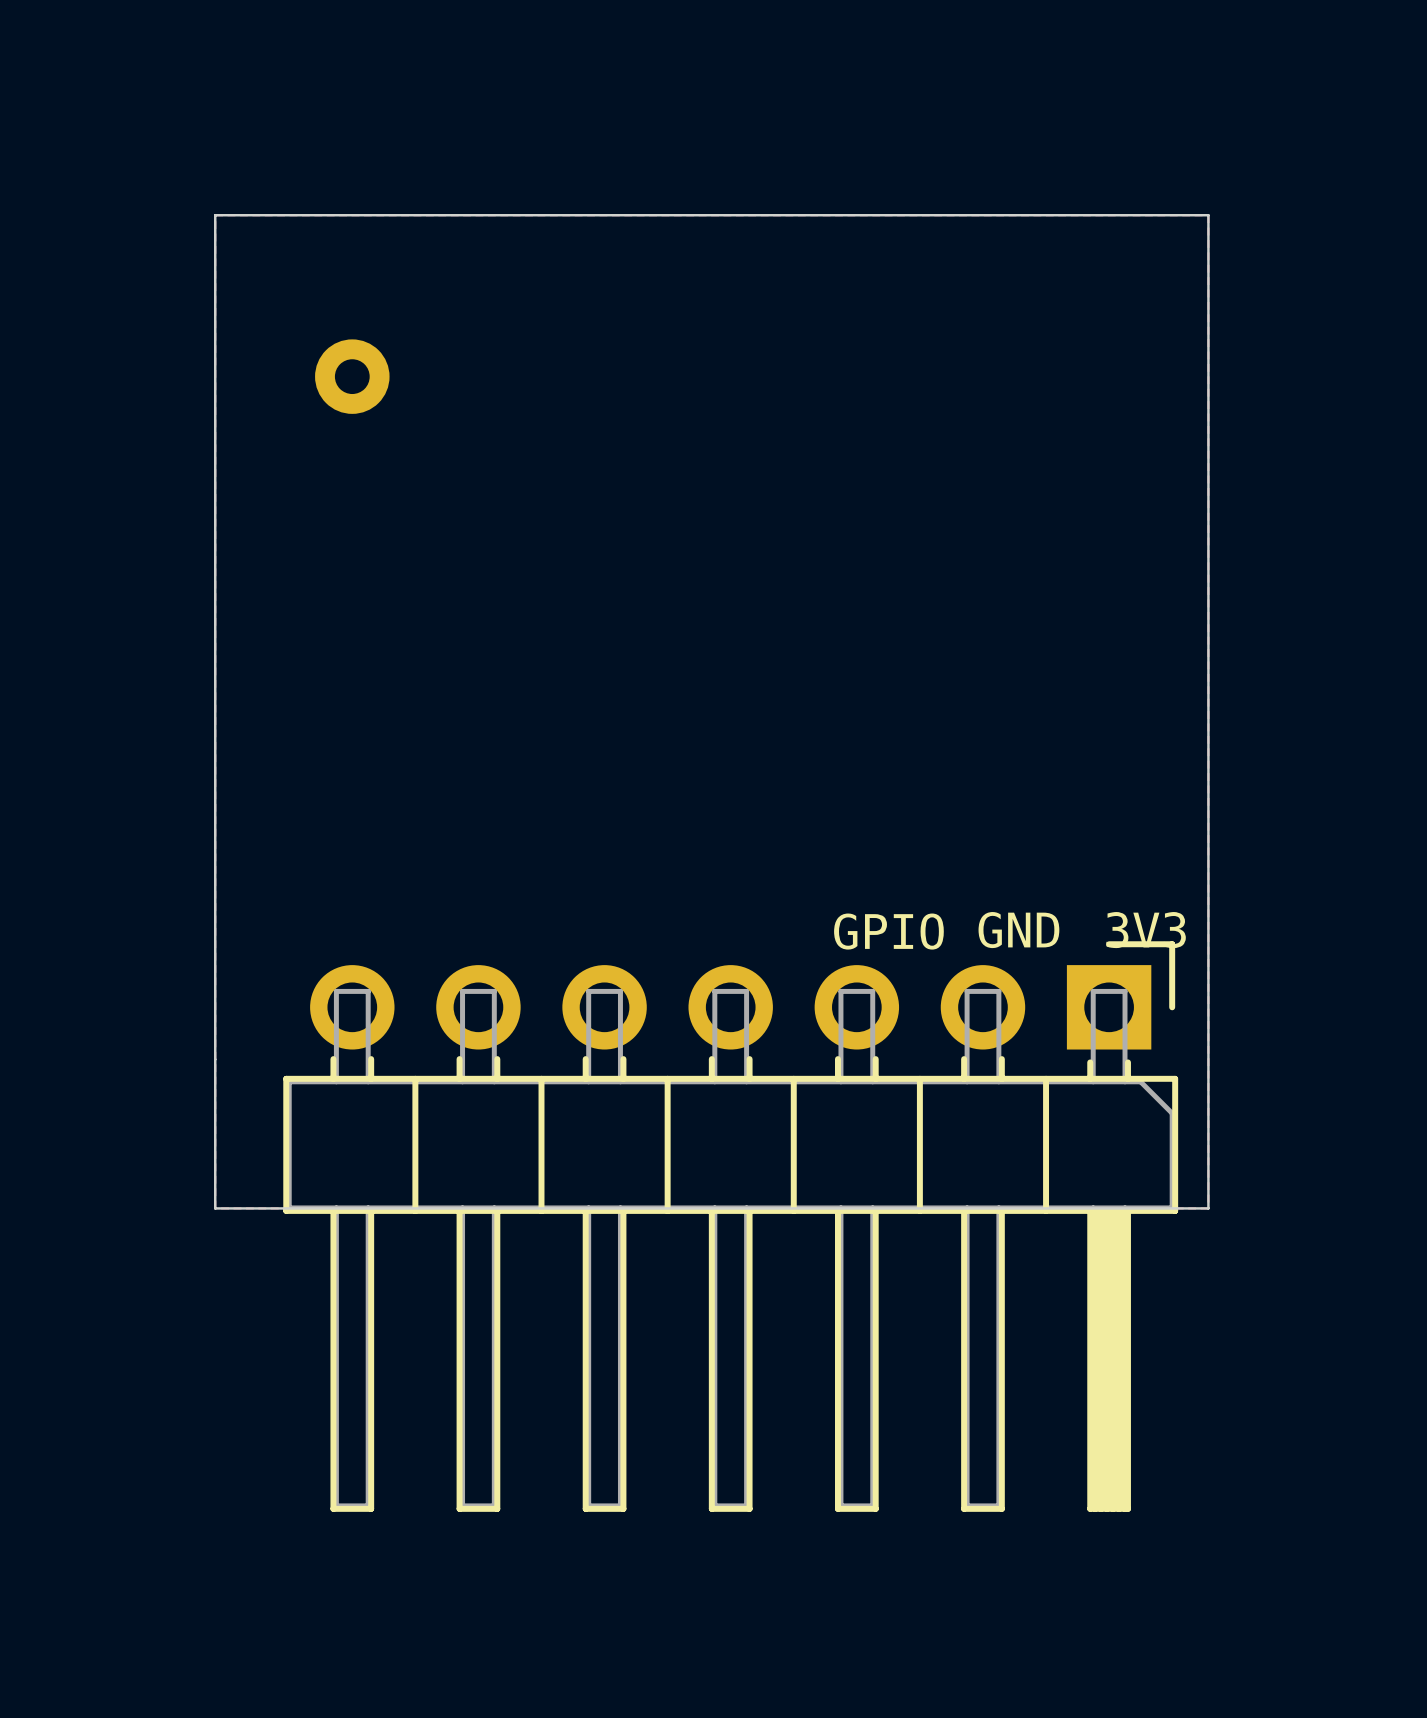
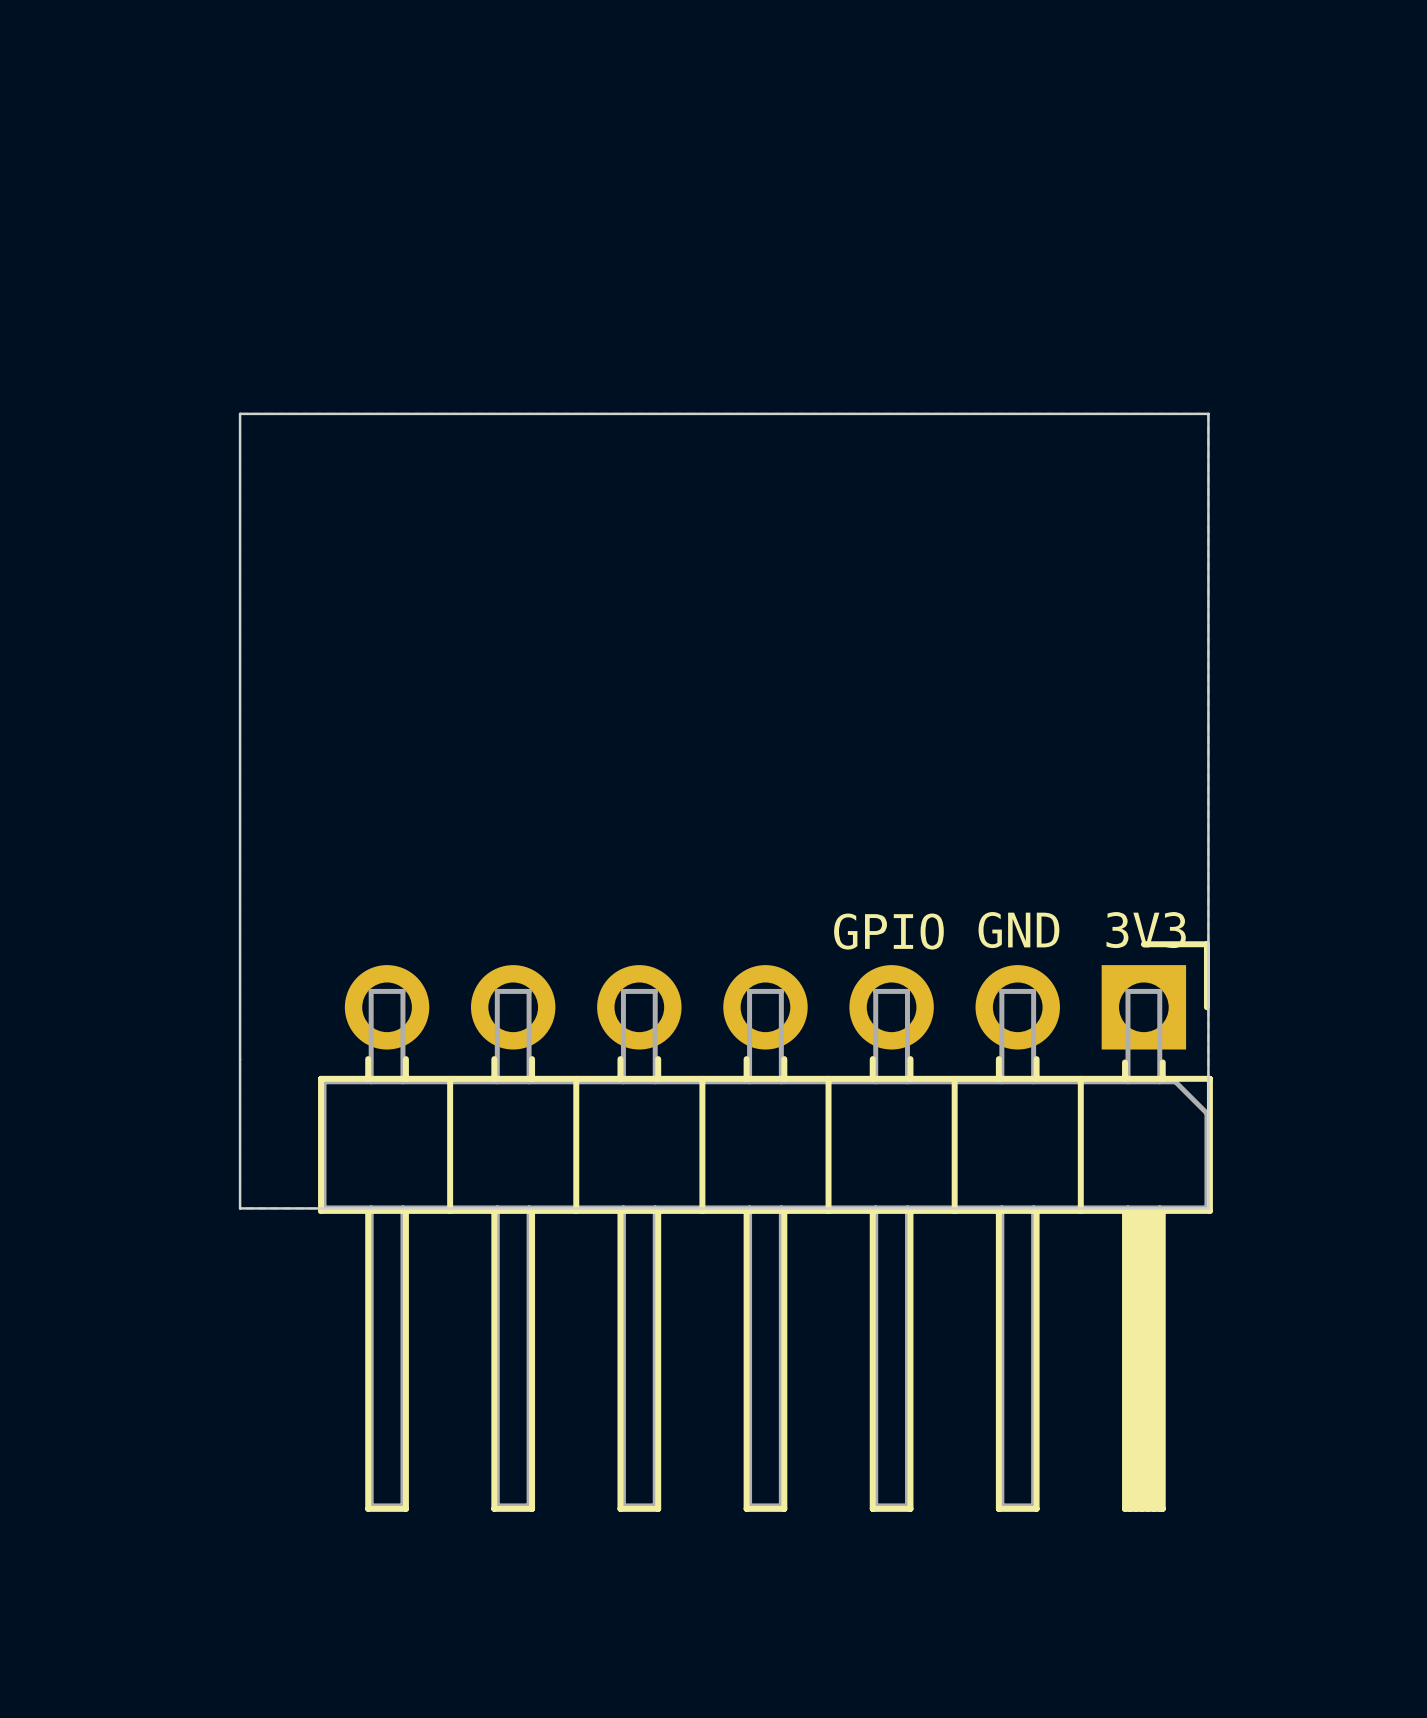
part: (352, 376) -> none
board edge: (1208, 413) (1208, 215) (215, 215) (215, 1208) (240, 1208) -> (1208, 413) (240, 413) (240, 1208)
part position: (730, 1226) -> (765, 1226)

